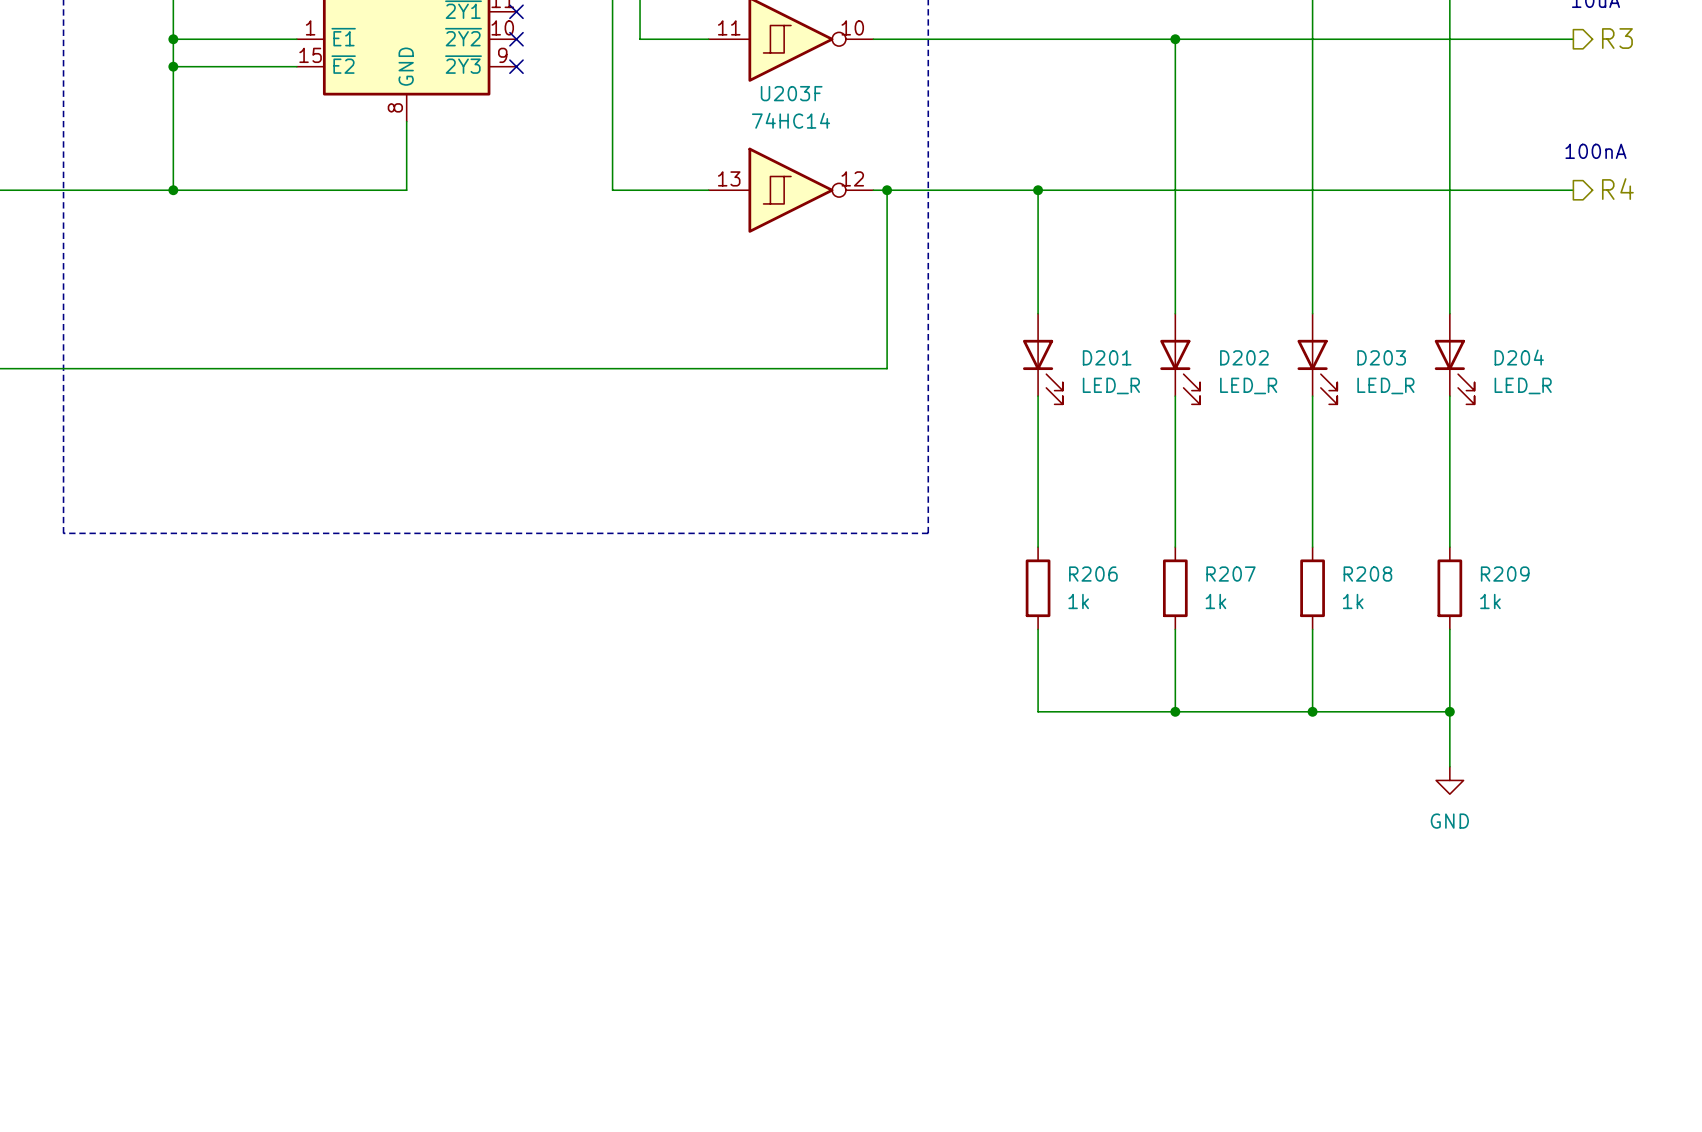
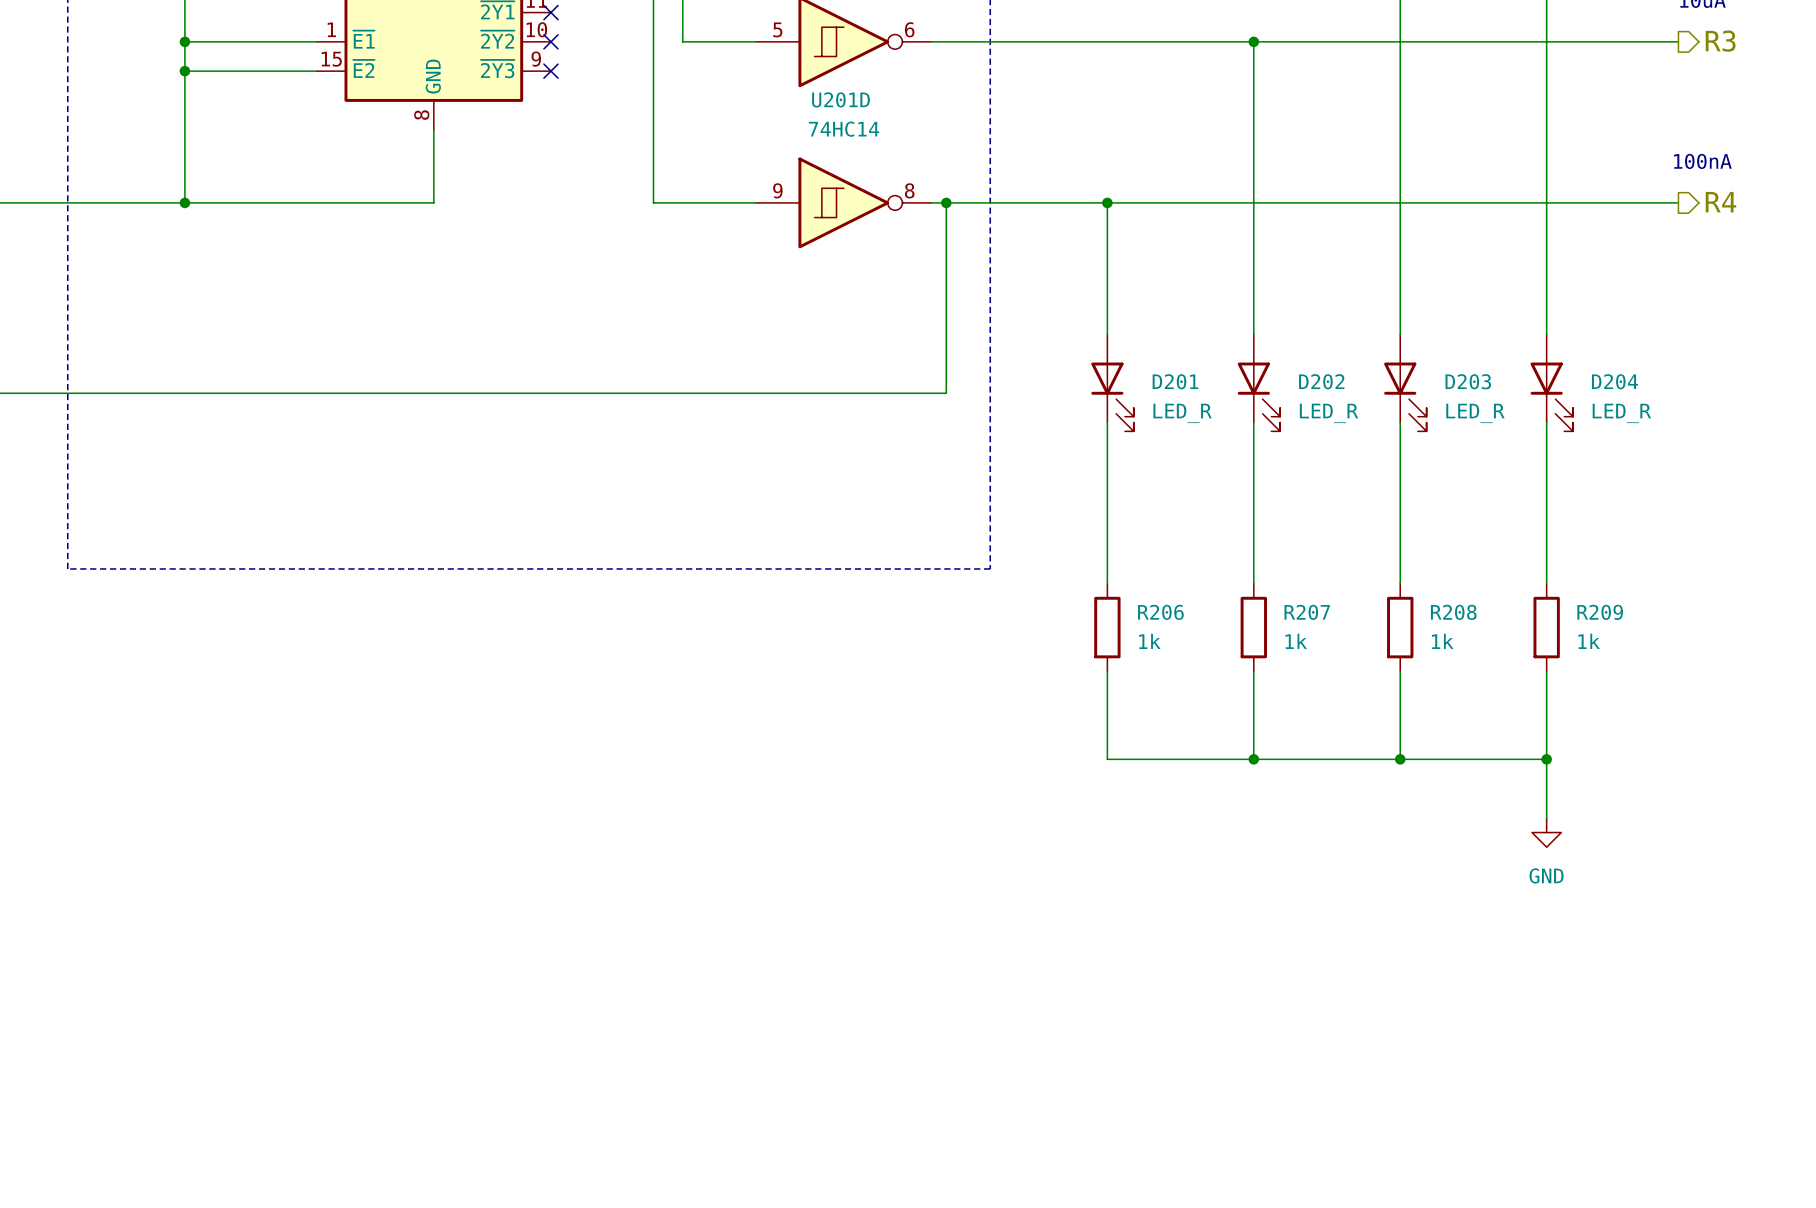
part pin number: 11 (729, 27) -> 5 (777, 29)
part pin number: 10 (852, 27) -> 6 (909, 29)
U203F name: U203F (791, 93) -> U201D (840, 99)
U203F pin number: 13 (729, 178) -> 9 (777, 190)
U203F pin number: 12 (852, 178) -> 8 (909, 190)

